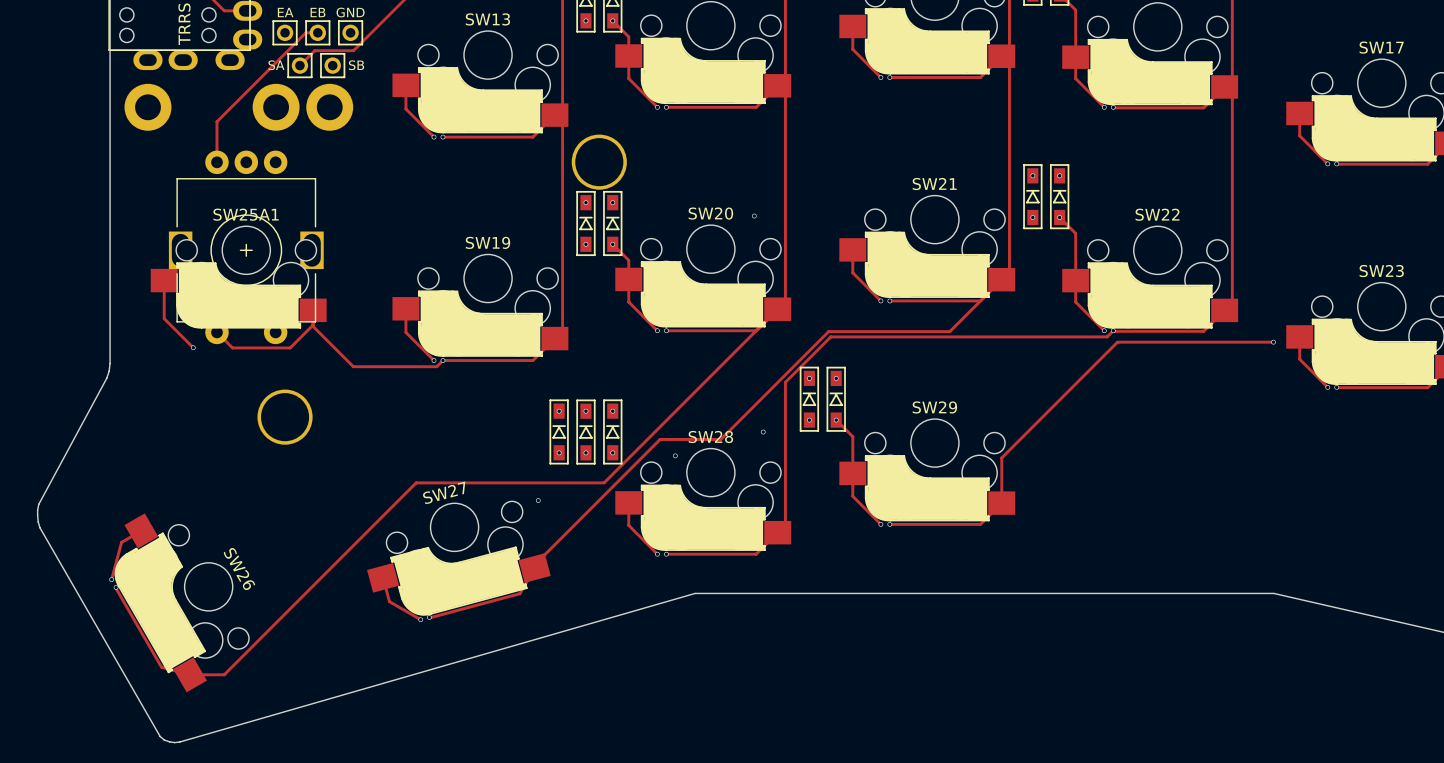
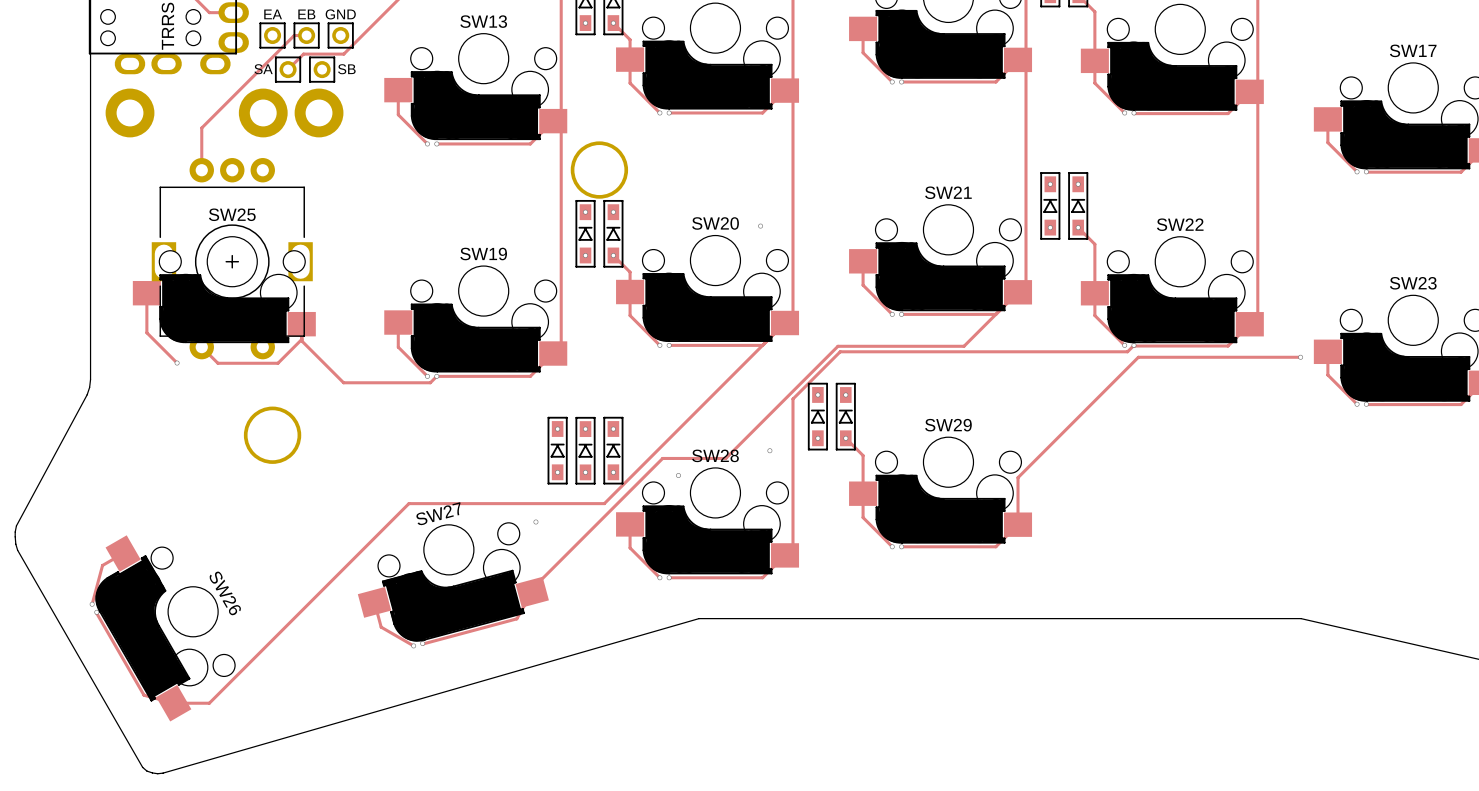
SW25A1 text: none -> SW25 (232, 214)
SW25A1 name: SW25A1 (246, 214) -> none

